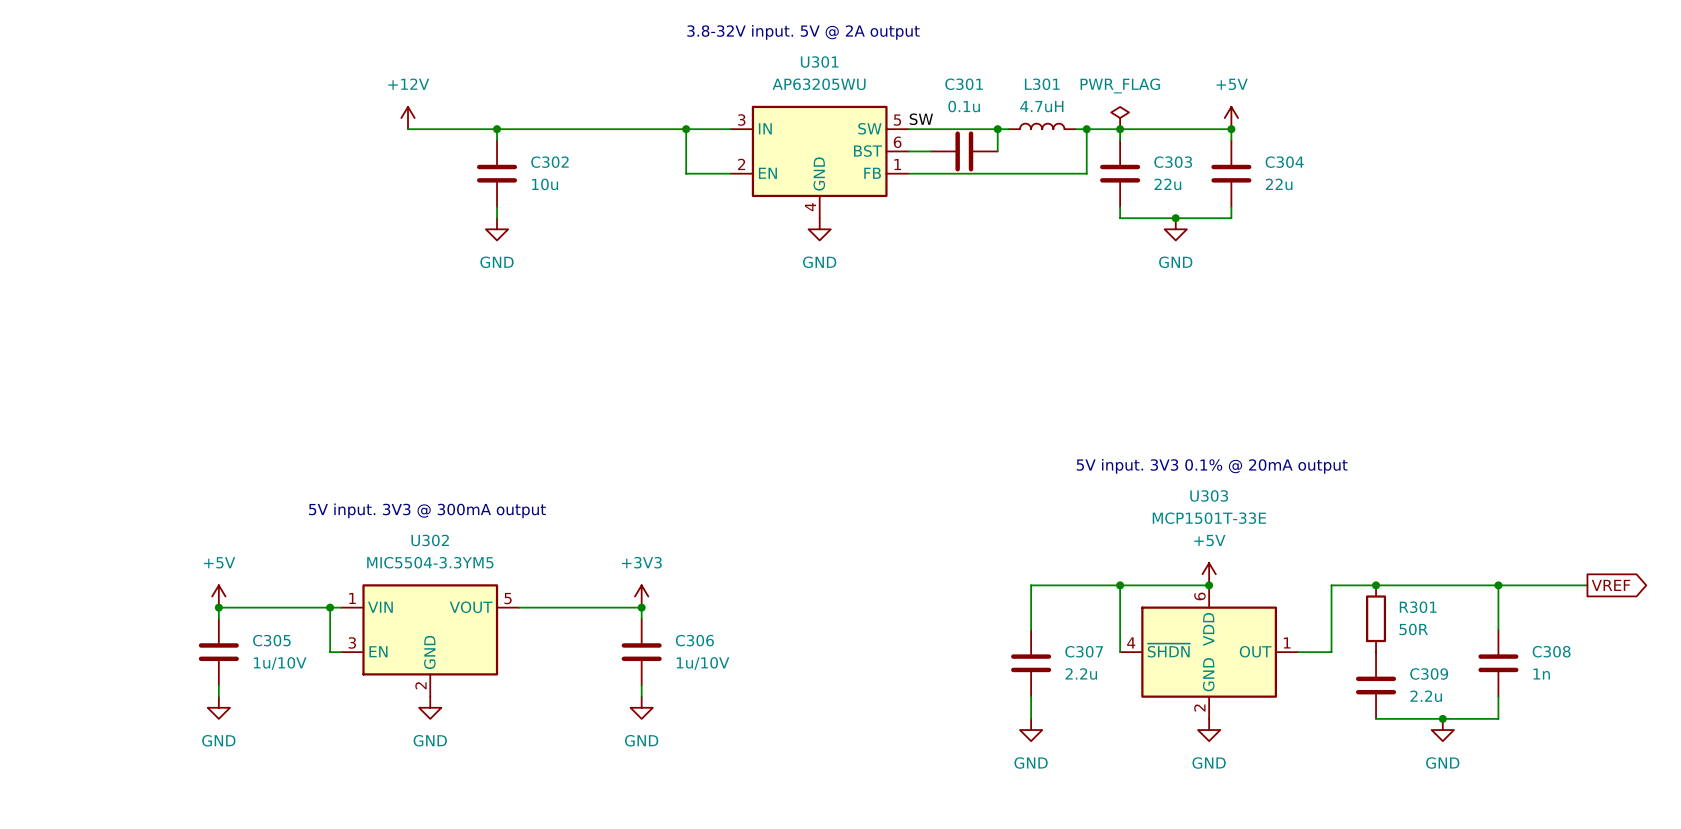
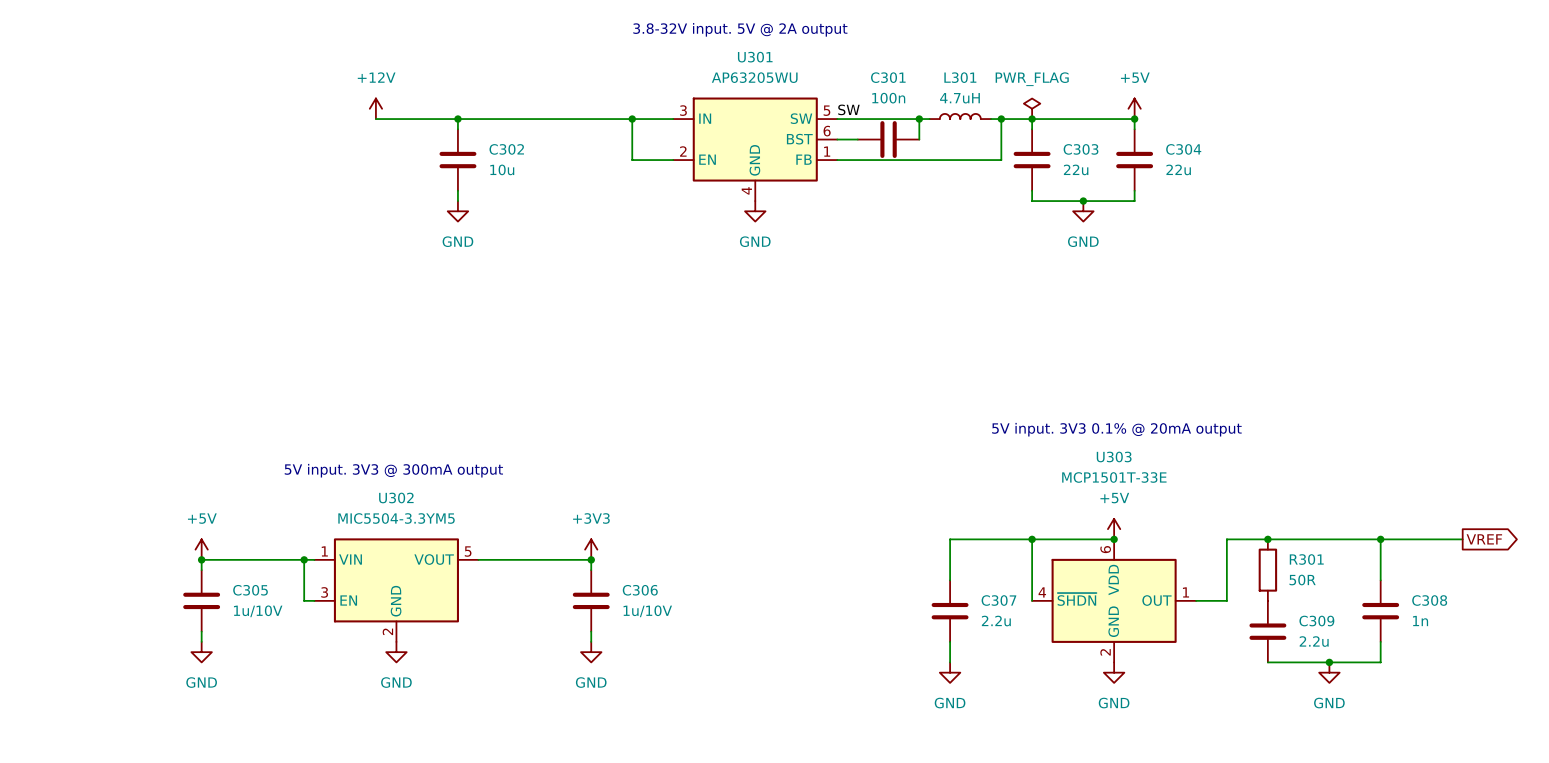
C301 value: 0.1u (964, 106) -> 100n (888, 98)

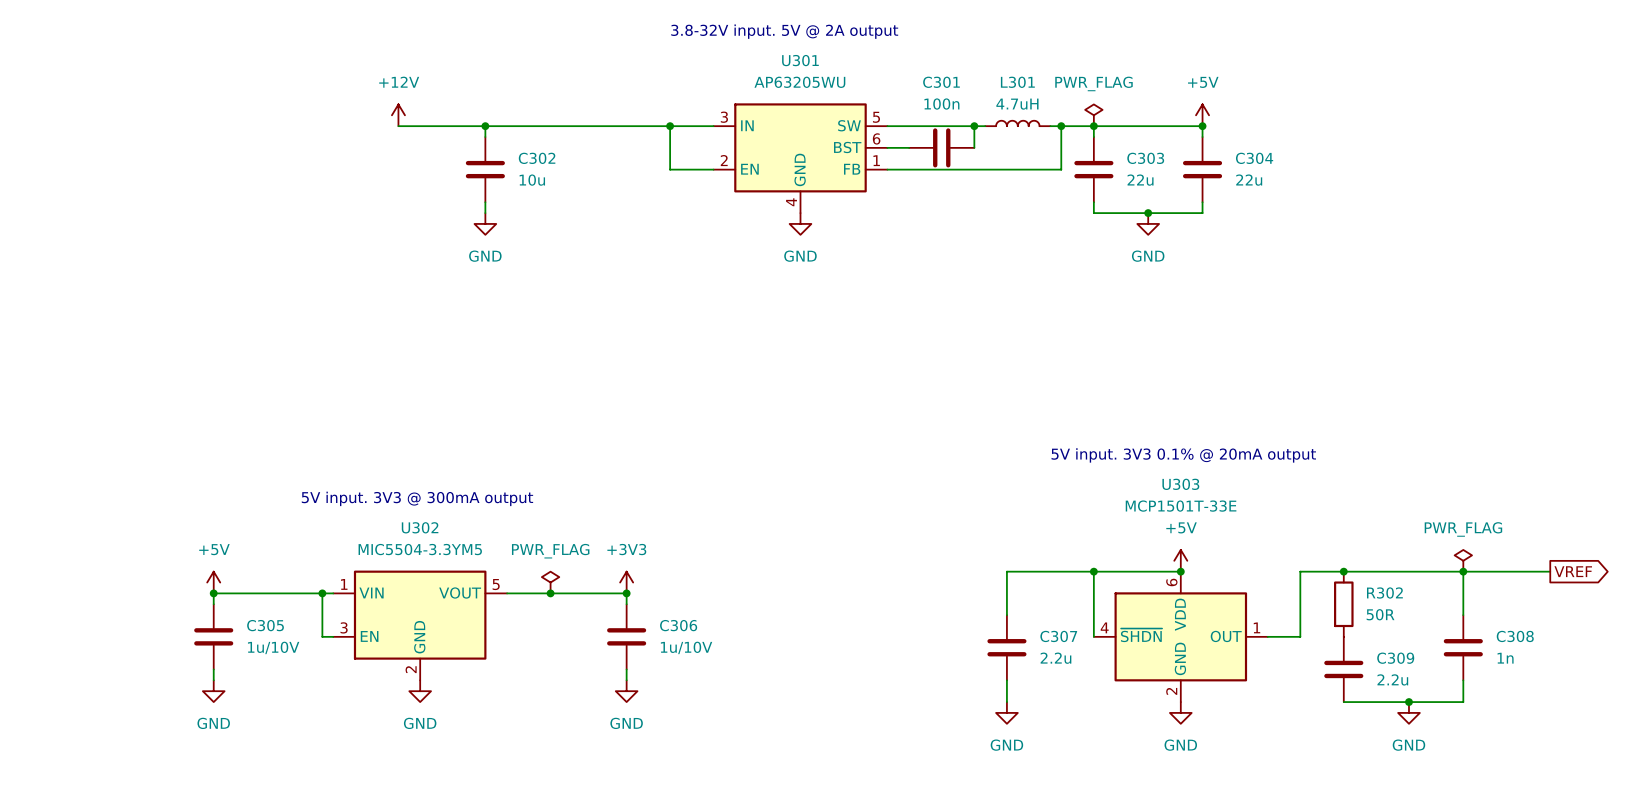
label: SW (848, 109) -> none
power symbol: none -> PWR_FLAG (1463, 560)
power symbol: none -> PWR_FLAG (550, 582)
junction: none -> (550, 593)
R301 name: R301 (1306, 559) -> R302 (1384, 593)

